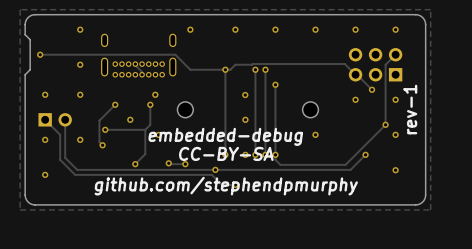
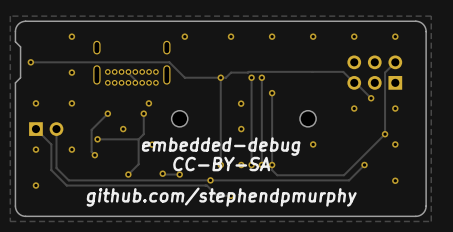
text: rev-1 (410, 109) -> none

